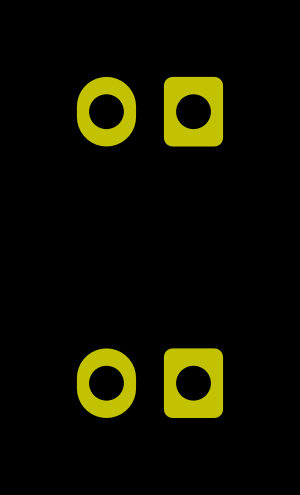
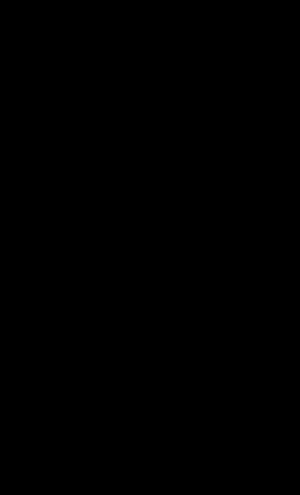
part: (149, 111) -> none
part: (149, 383) -> none

